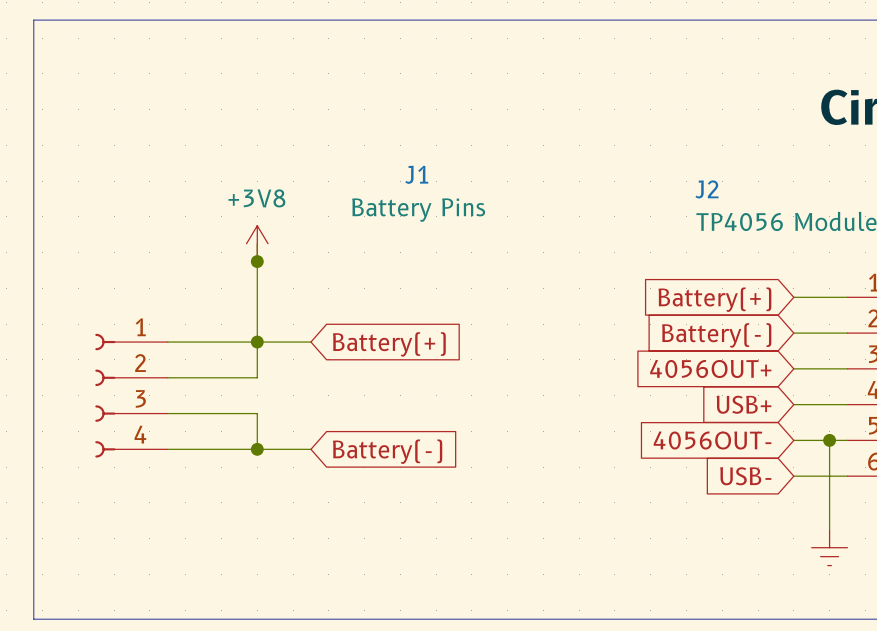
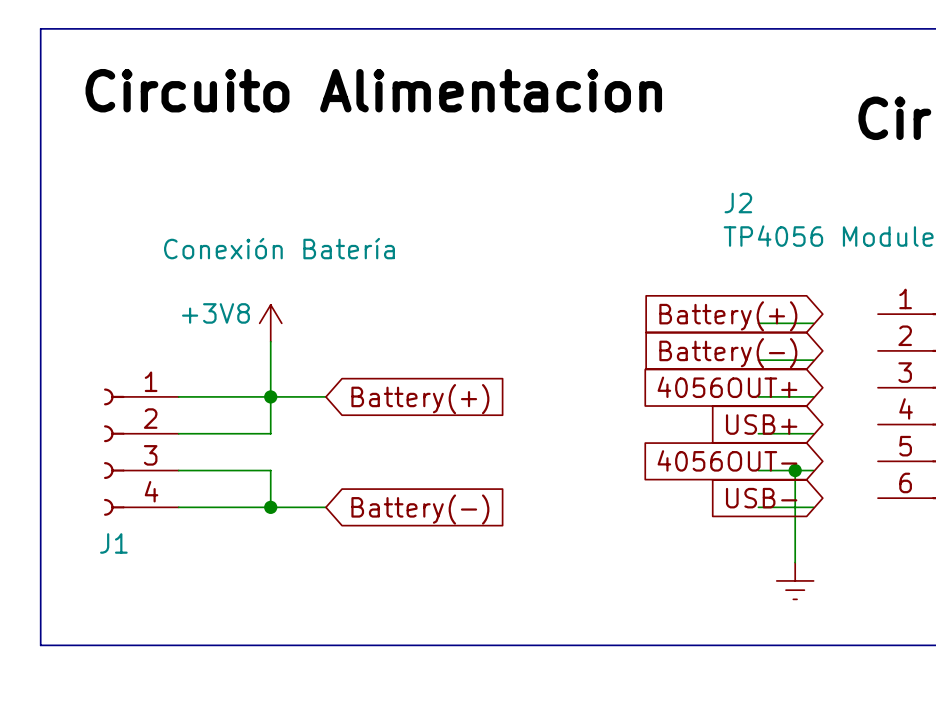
label: none -> Circuito Alimentacion (373, 90)
J1 name position: J1 (416, 174) -> J1 (113, 543)
power symbol text position: +3V8 (256, 198) -> +3V8 (215, 313)
J1 value: Battery Pins (418, 210) -> Conexión Batería (279, 248)
wire: (257, 243) (257, 324) -> none
power symbol position: +3V8 (257, 243) -> +3V8 (270, 323)
junction: (257, 261) -> none
wire: (793, 297) (847, 297) -> (758, 323) (813, 323)
wire: (793, 333) (847, 333) -> (758, 360) (813, 360)
wire: (167, 342) (310, 342) -> (178, 507) (325, 507)
junction: (257, 342) -> none
global label position: Battery(+) (389, 344) -> Battery(+) (420, 399)
wire: (793, 368) (847, 368) -> (758, 396) (813, 396)
junction: none -> (270, 396)
J1 position: (131, 395) -> (141, 452)
wire: (793, 404) (847, 404) -> (758, 433) (813, 433)
wire: (257, 413) (257, 449) (310, 449) -> (270, 433) (270, 396) (325, 396)
wire: (793, 440) (847, 440) -> (758, 470) (813, 470)
wire: (829, 440) (829, 529) -> (795, 470) (795, 562)
junction position: (829, 440) -> (795, 470)
wire: none -> (270, 470) (270, 507)
junction: (257, 449) -> none
global label position: Battery(-) (387, 451) -> Battery(-) (420, 509)
wire: (793, 476) (847, 476) -> (758, 507) (813, 507)
junction: none -> (270, 507)
power symbol position: (829, 547) -> (795, 580)

